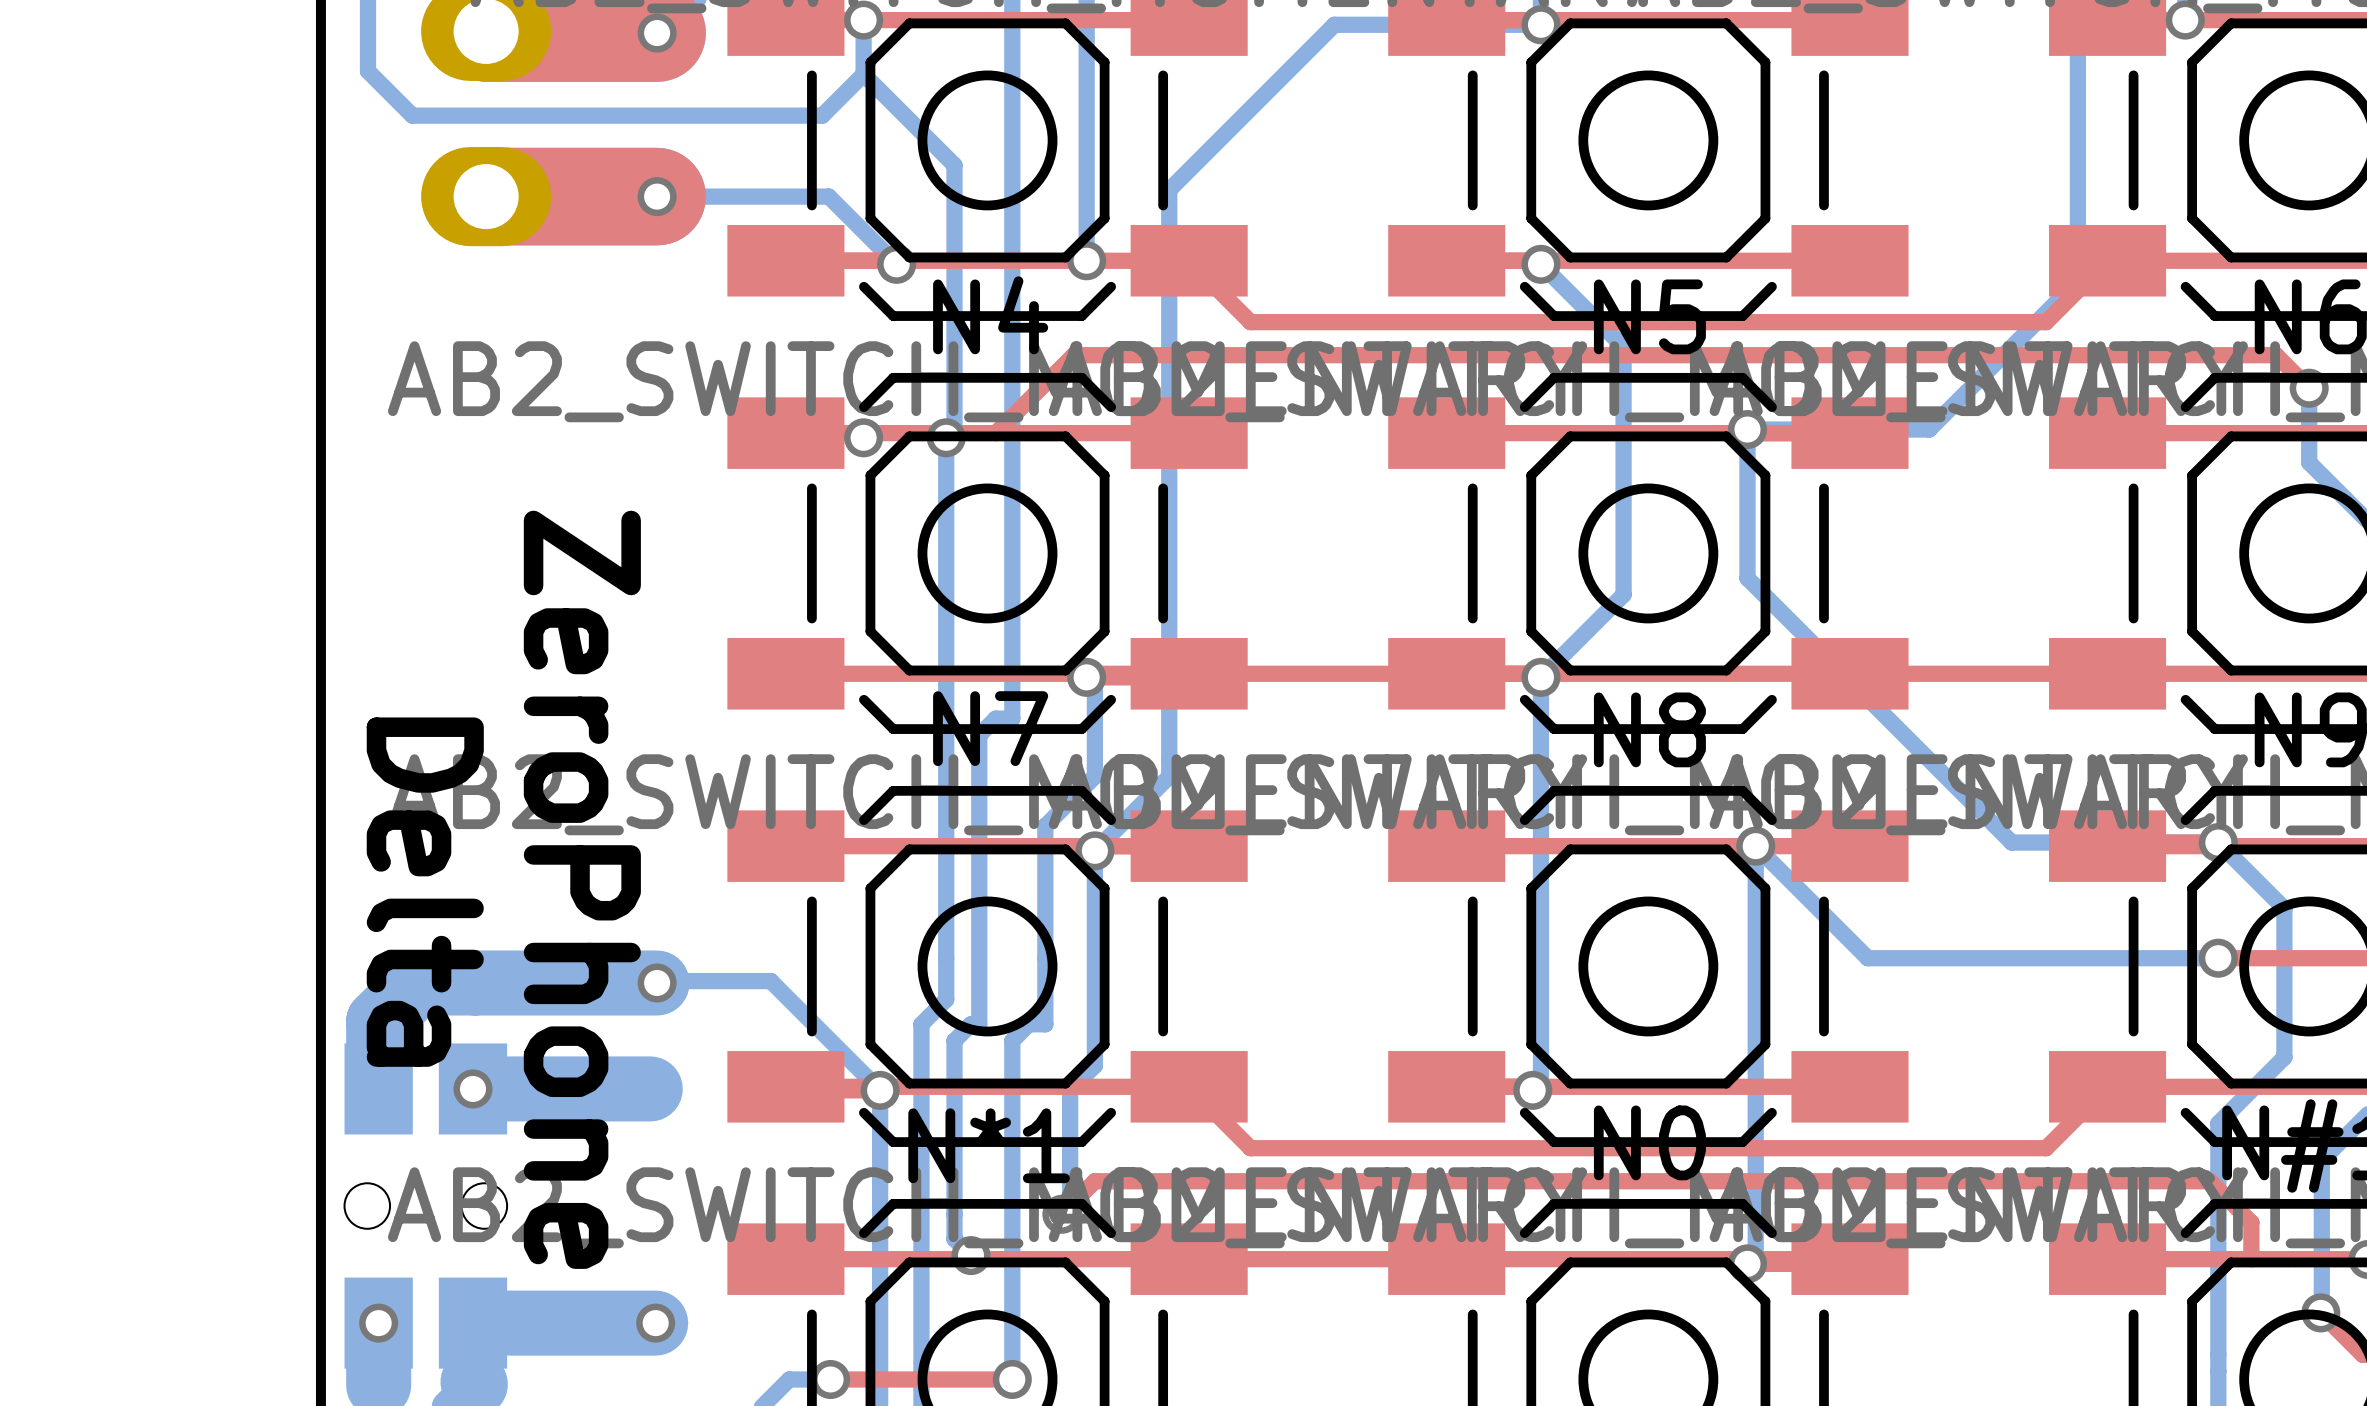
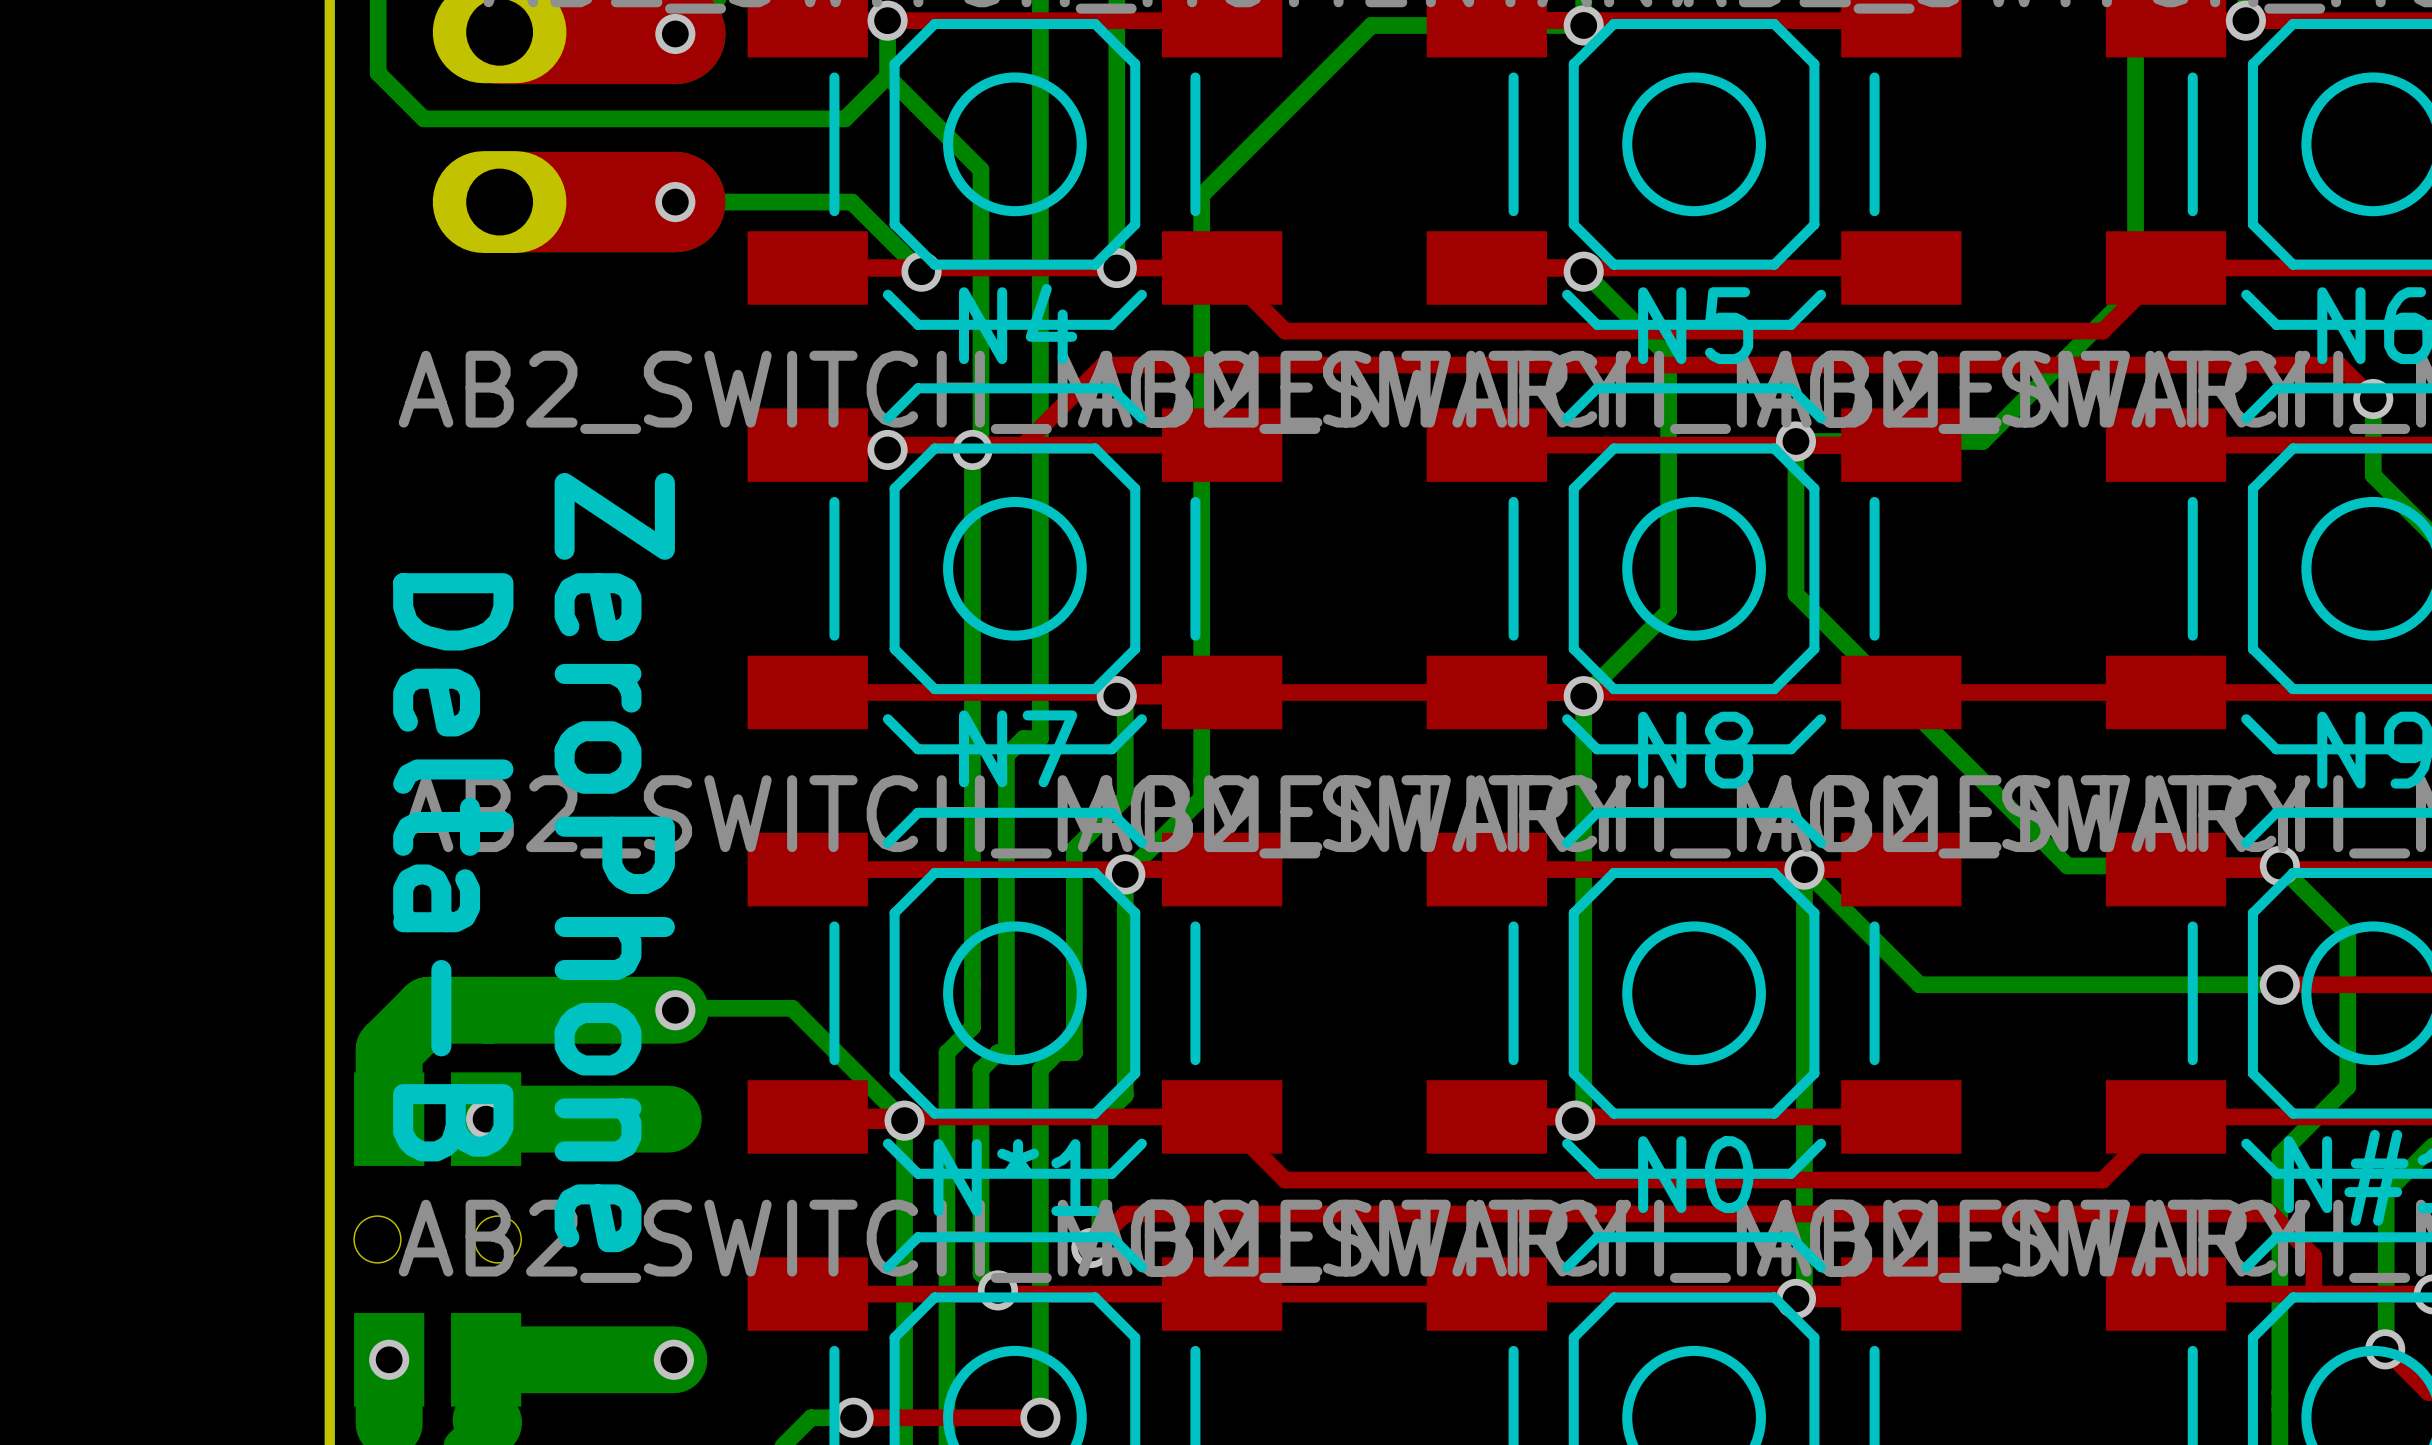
text position: ZeroPhone (582, 889) -> ZeroPhone (614, 862)
text: Delta (425, 892) -> Delta-B (453, 867)

